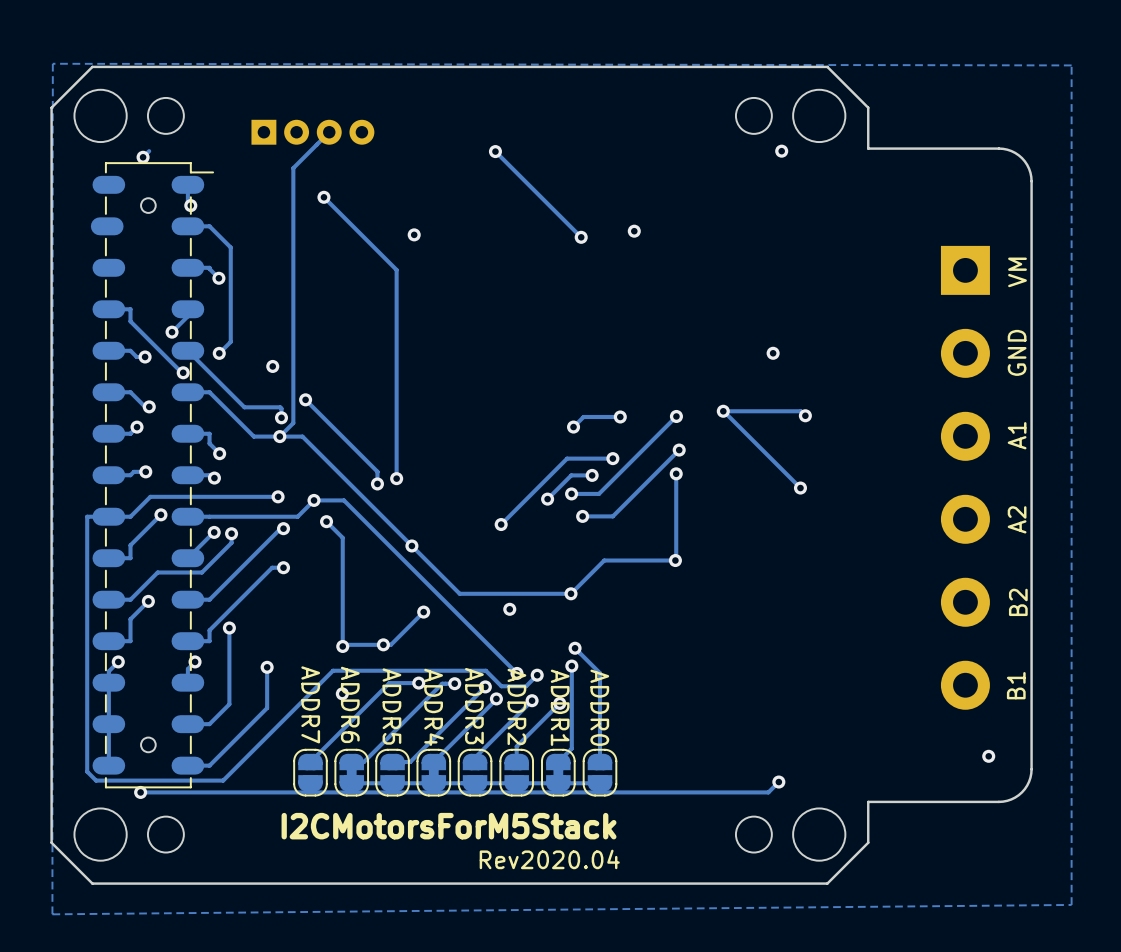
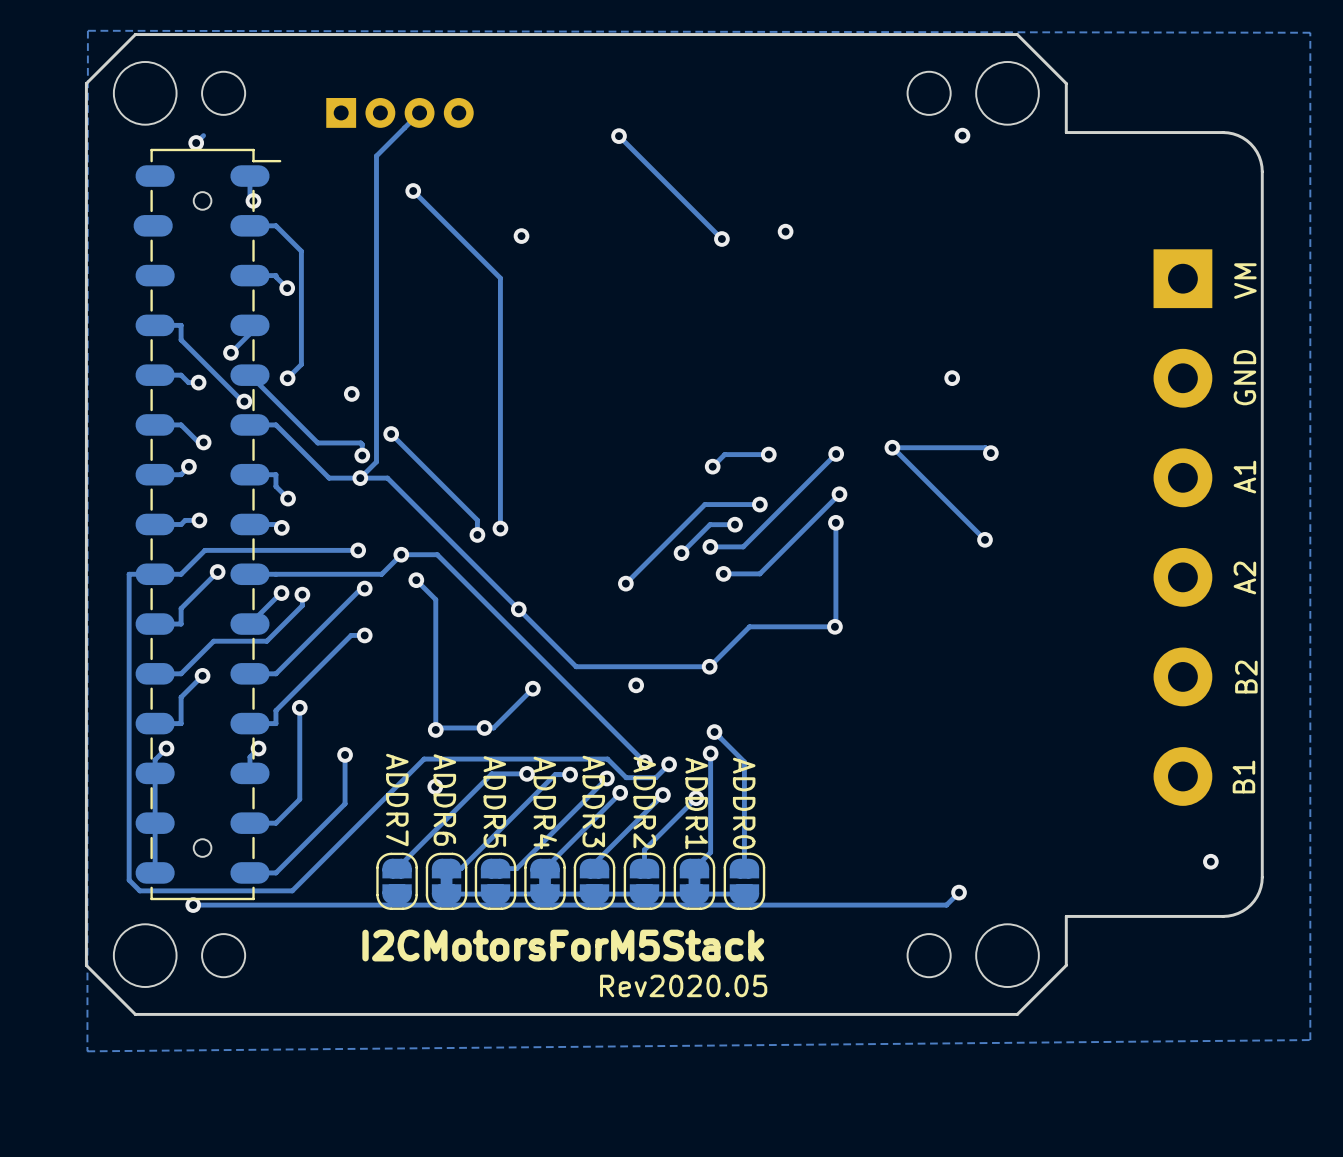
text: Rev2020.04 (549, 859) -> Rev2020.05 (683, 985)

